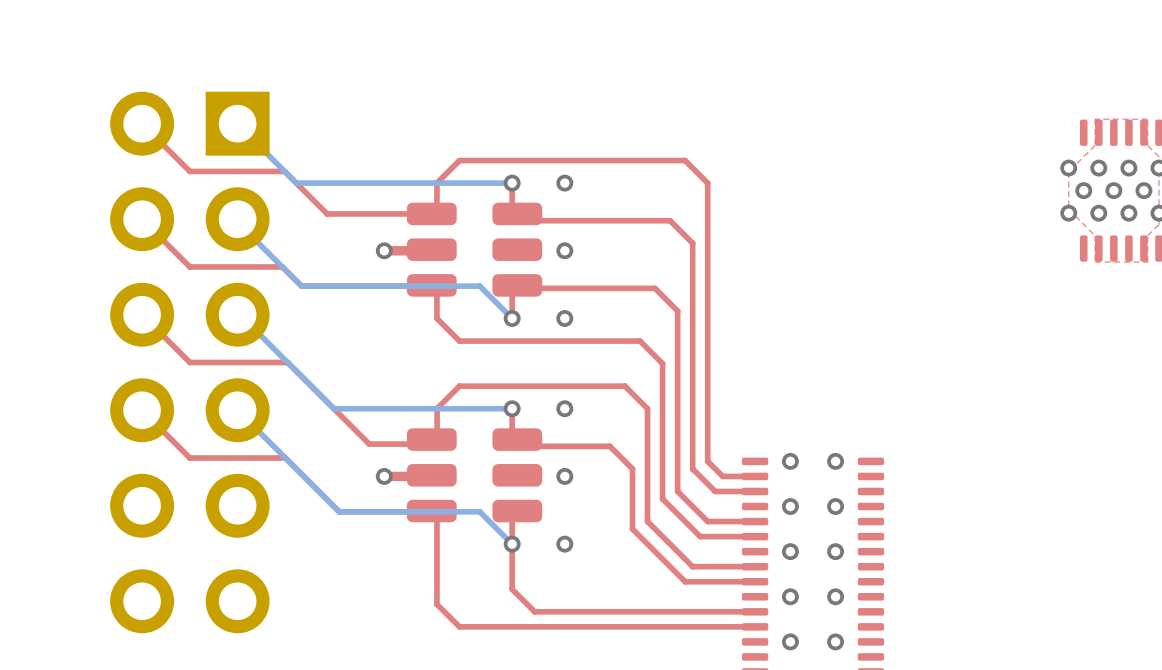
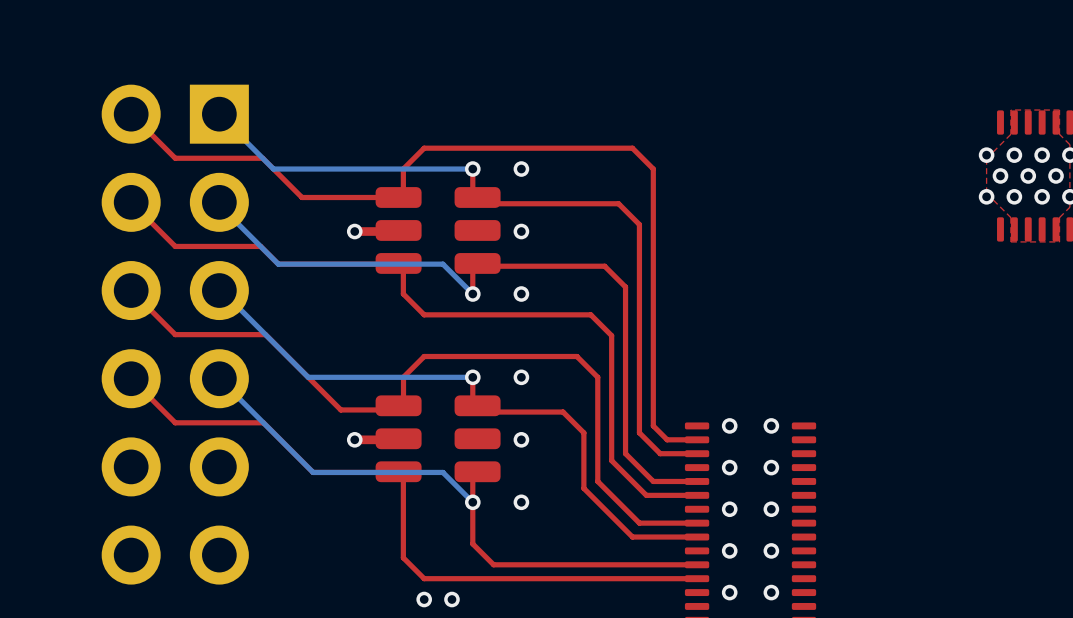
via: none -> (424, 599)
via: none -> (451, 599)

